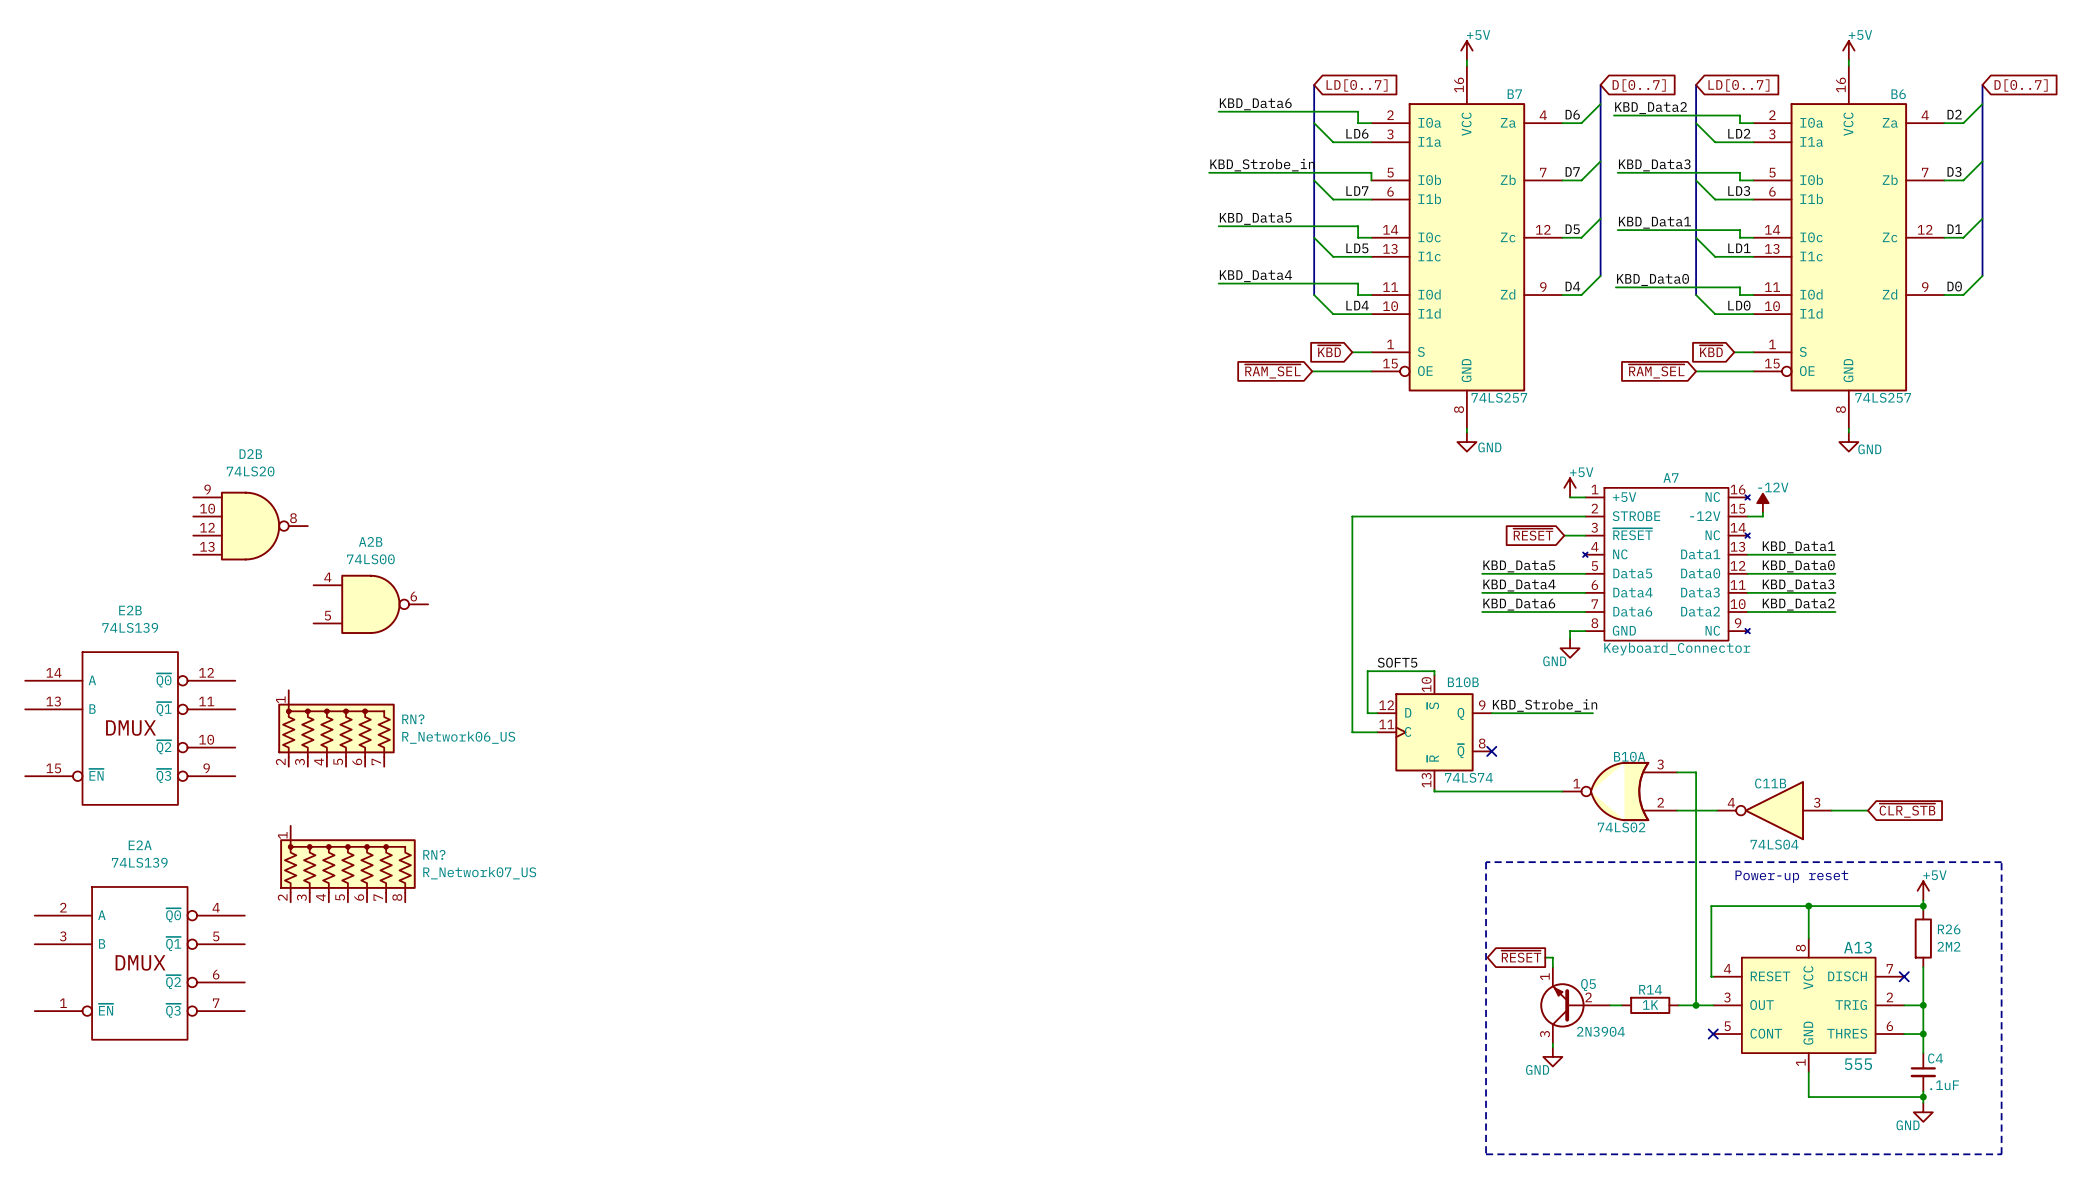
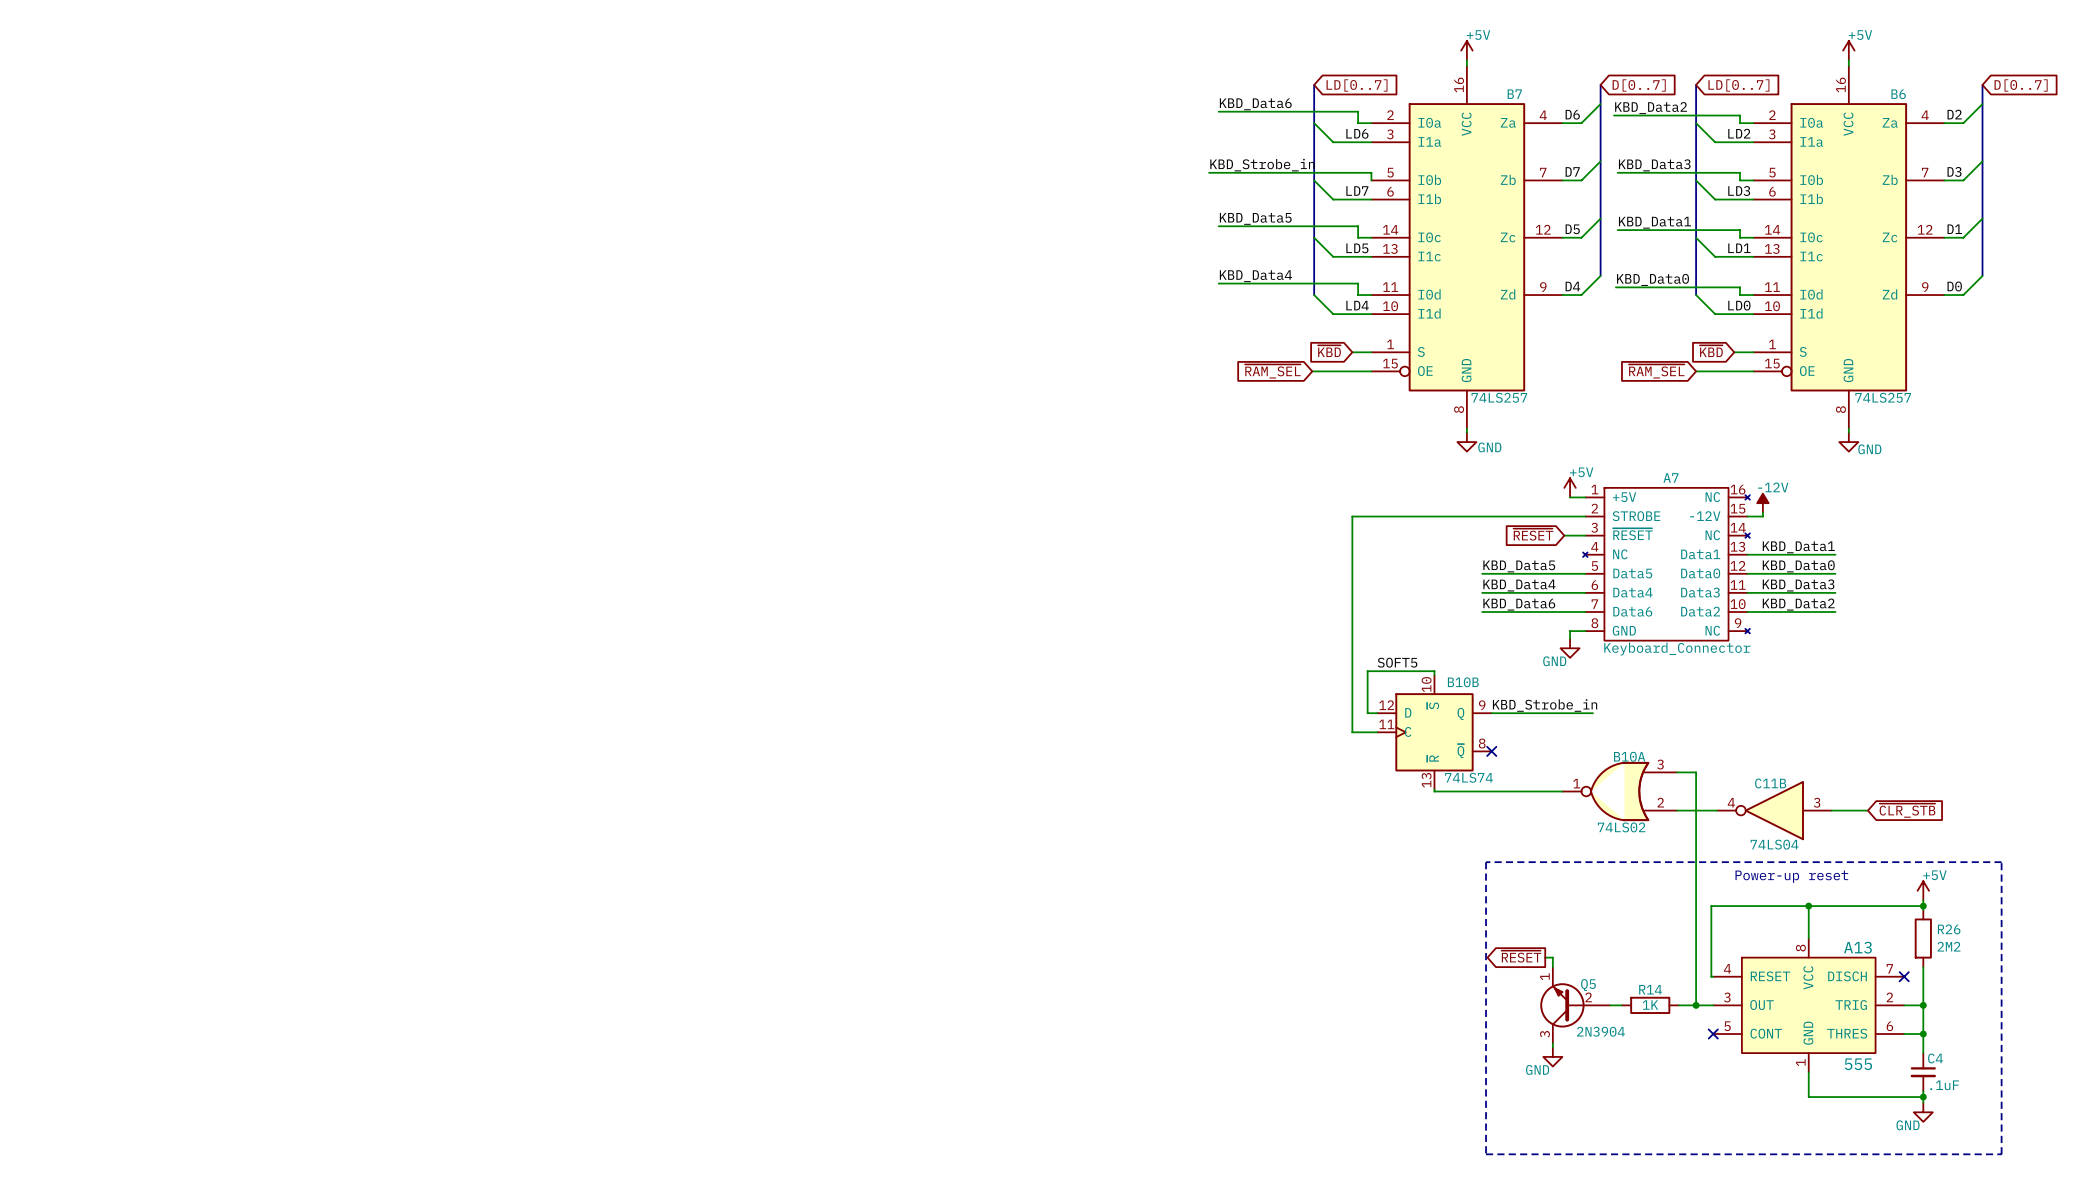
D2B: 74LS20 (250, 526) -> none
A2B: 74LS00 (370, 604) -> none
E2B: 74LS139 (130, 728) -> none
RN?: R_Network06_US (336, 728) -> none
RN?: R_Network07_US (347, 864) -> none
E2A: 74LS139 (139, 963) -> none

